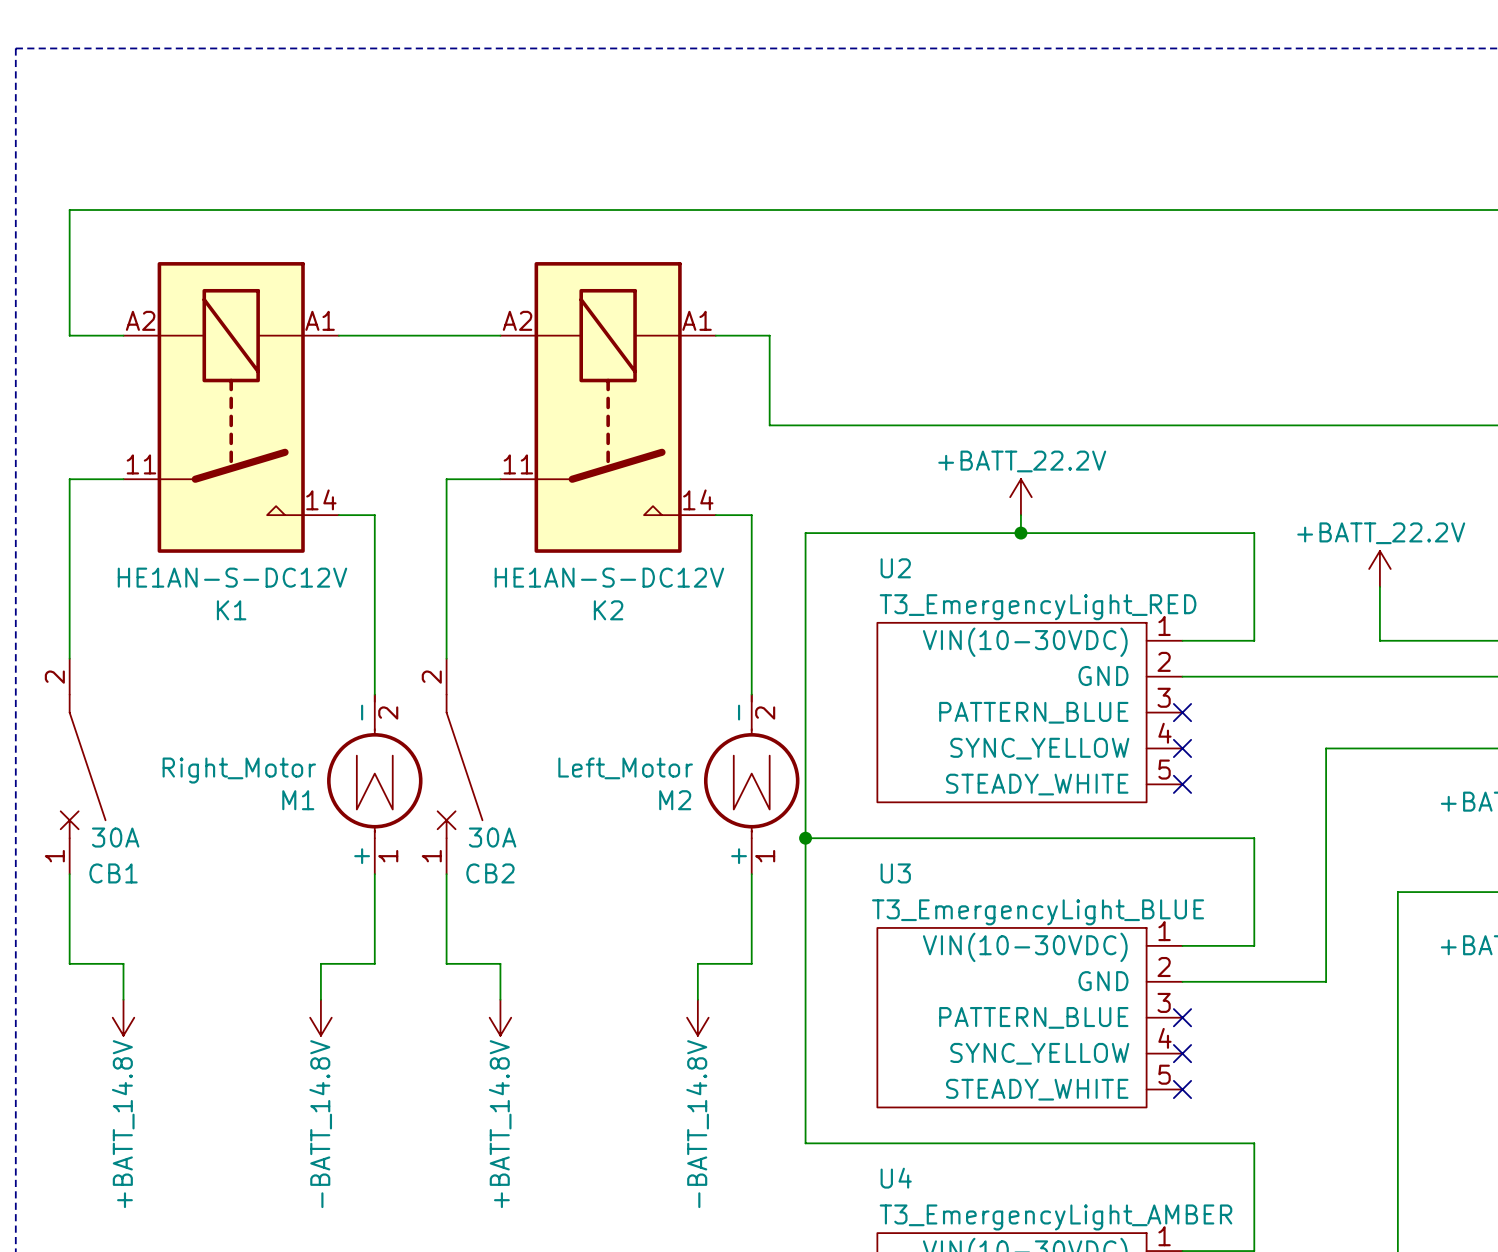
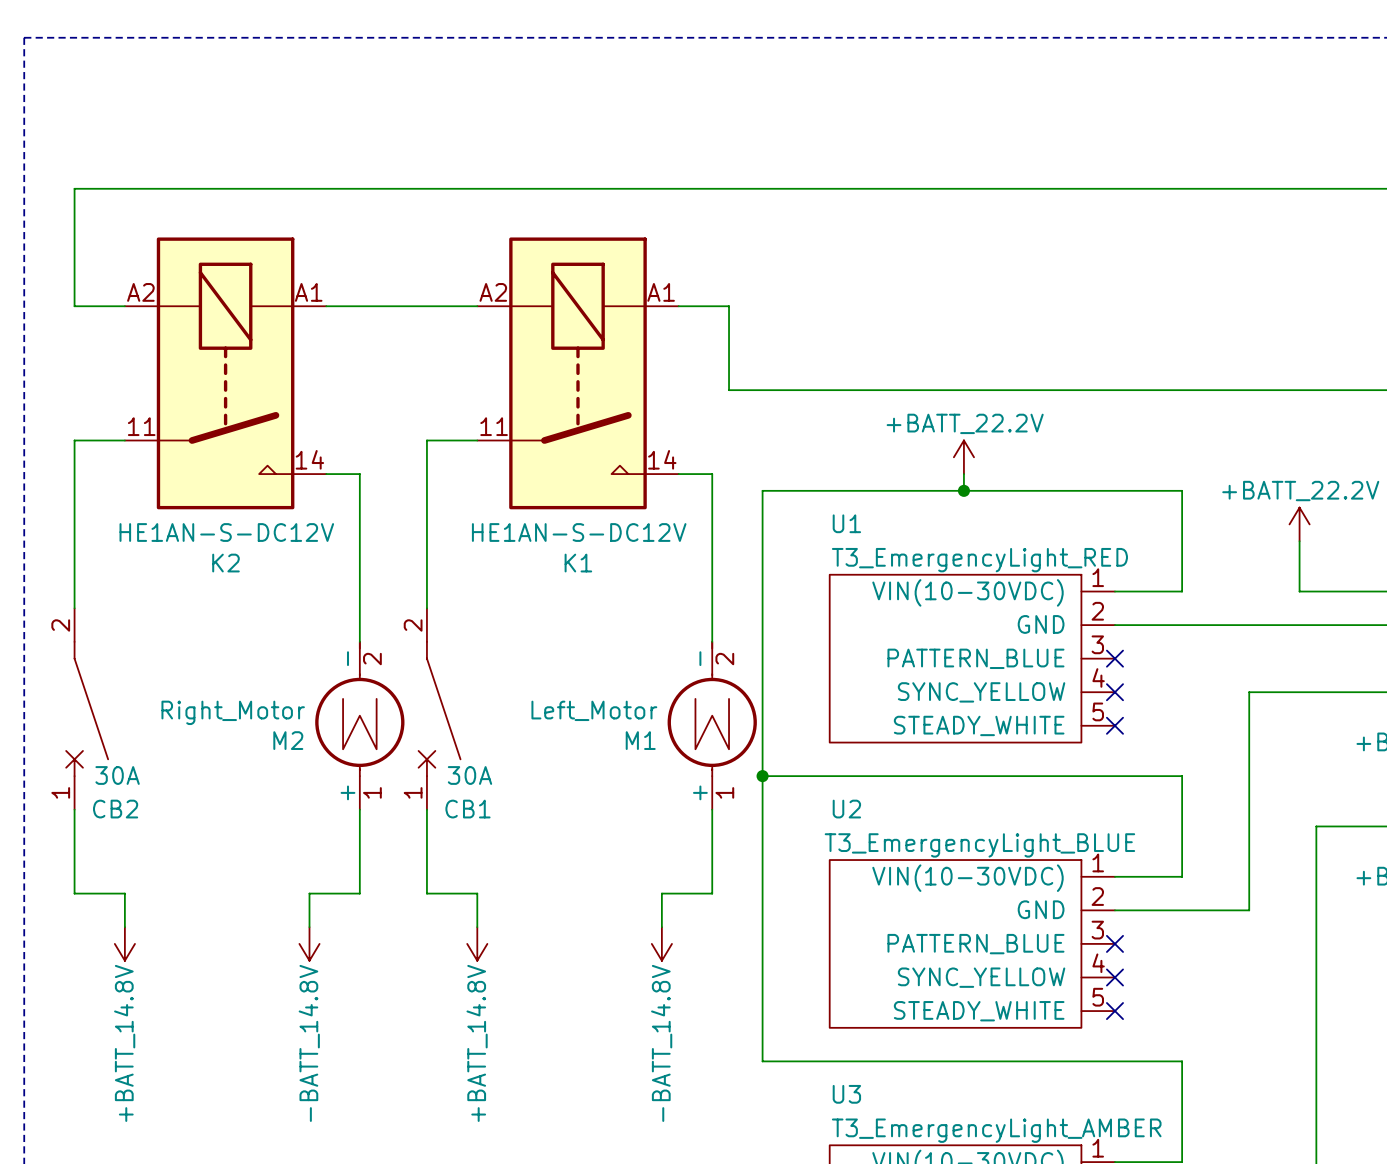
U2 name: U2 (895, 568) -> U1 (846, 523)
K1 name: K1 (231, 610) -> K2 (225, 563)
K2 name: K2 (608, 610) -> K1 (578, 563)
M1 name: M1 (298, 800) -> M2 (288, 740)
M2 name: M2 (675, 800) -> M1 (640, 740)
CB1 name: CB1 (113, 873) -> CB2 (115, 809)
CB2 name: CB2 (490, 873) -> CB1 (467, 809)
U3 name: U3 (895, 873) -> U2 (846, 809)
U4 name: U4 (896, 1178) -> U3 (846, 1094)

